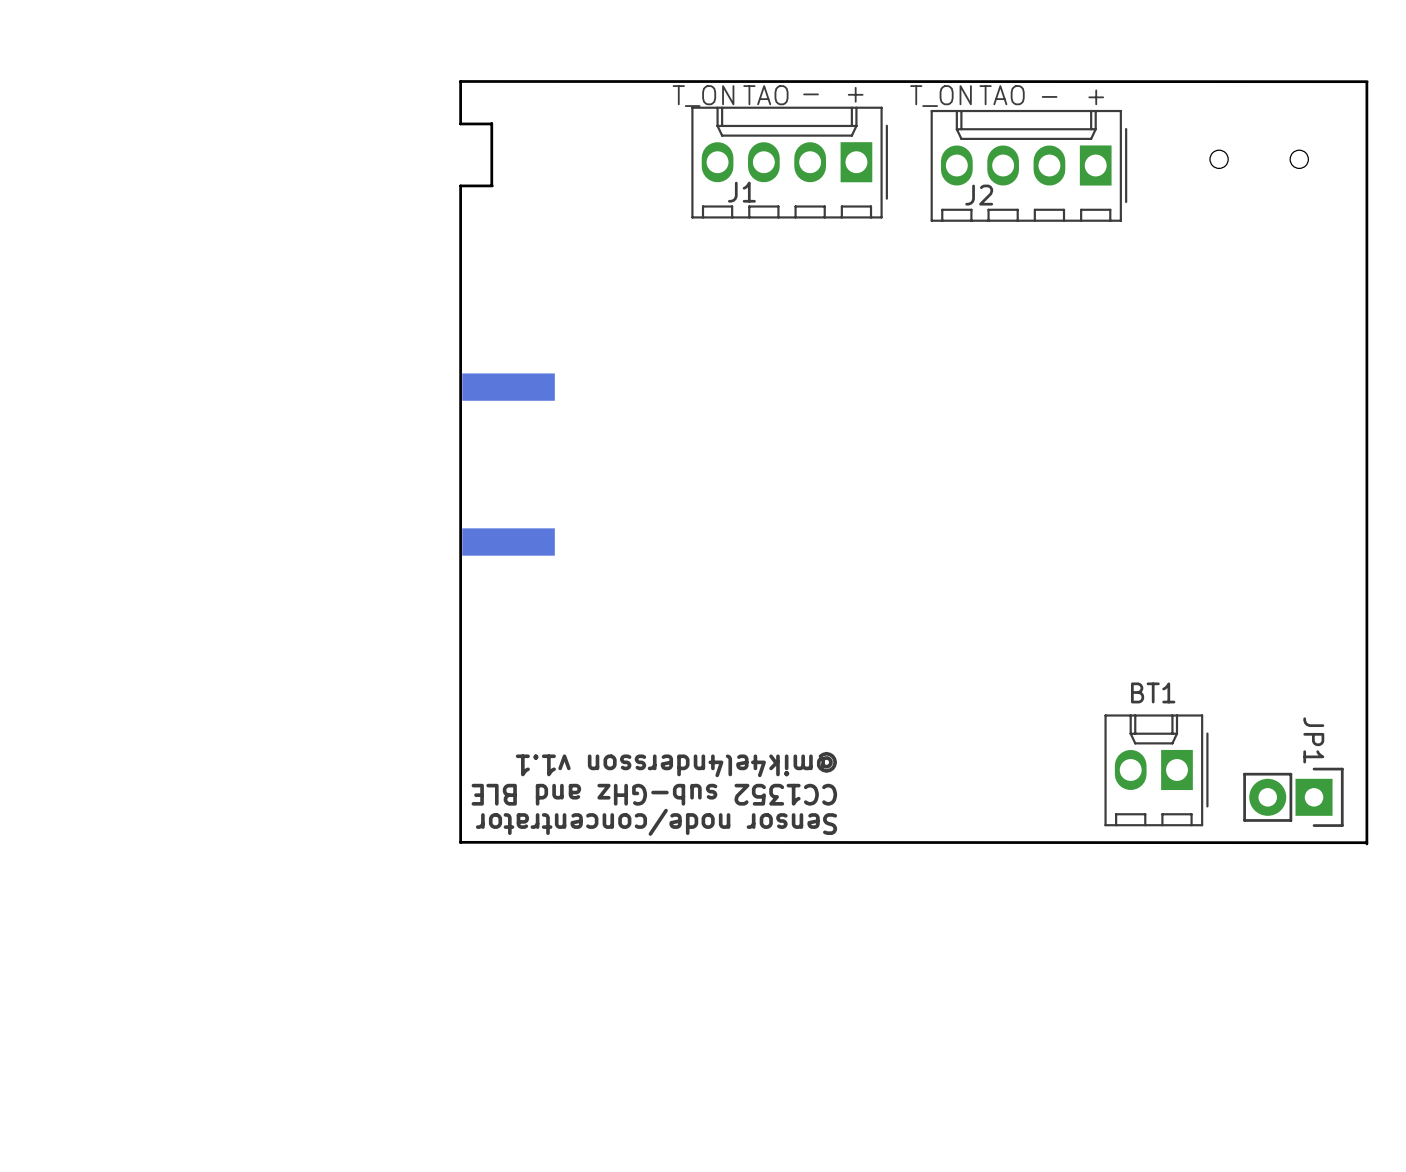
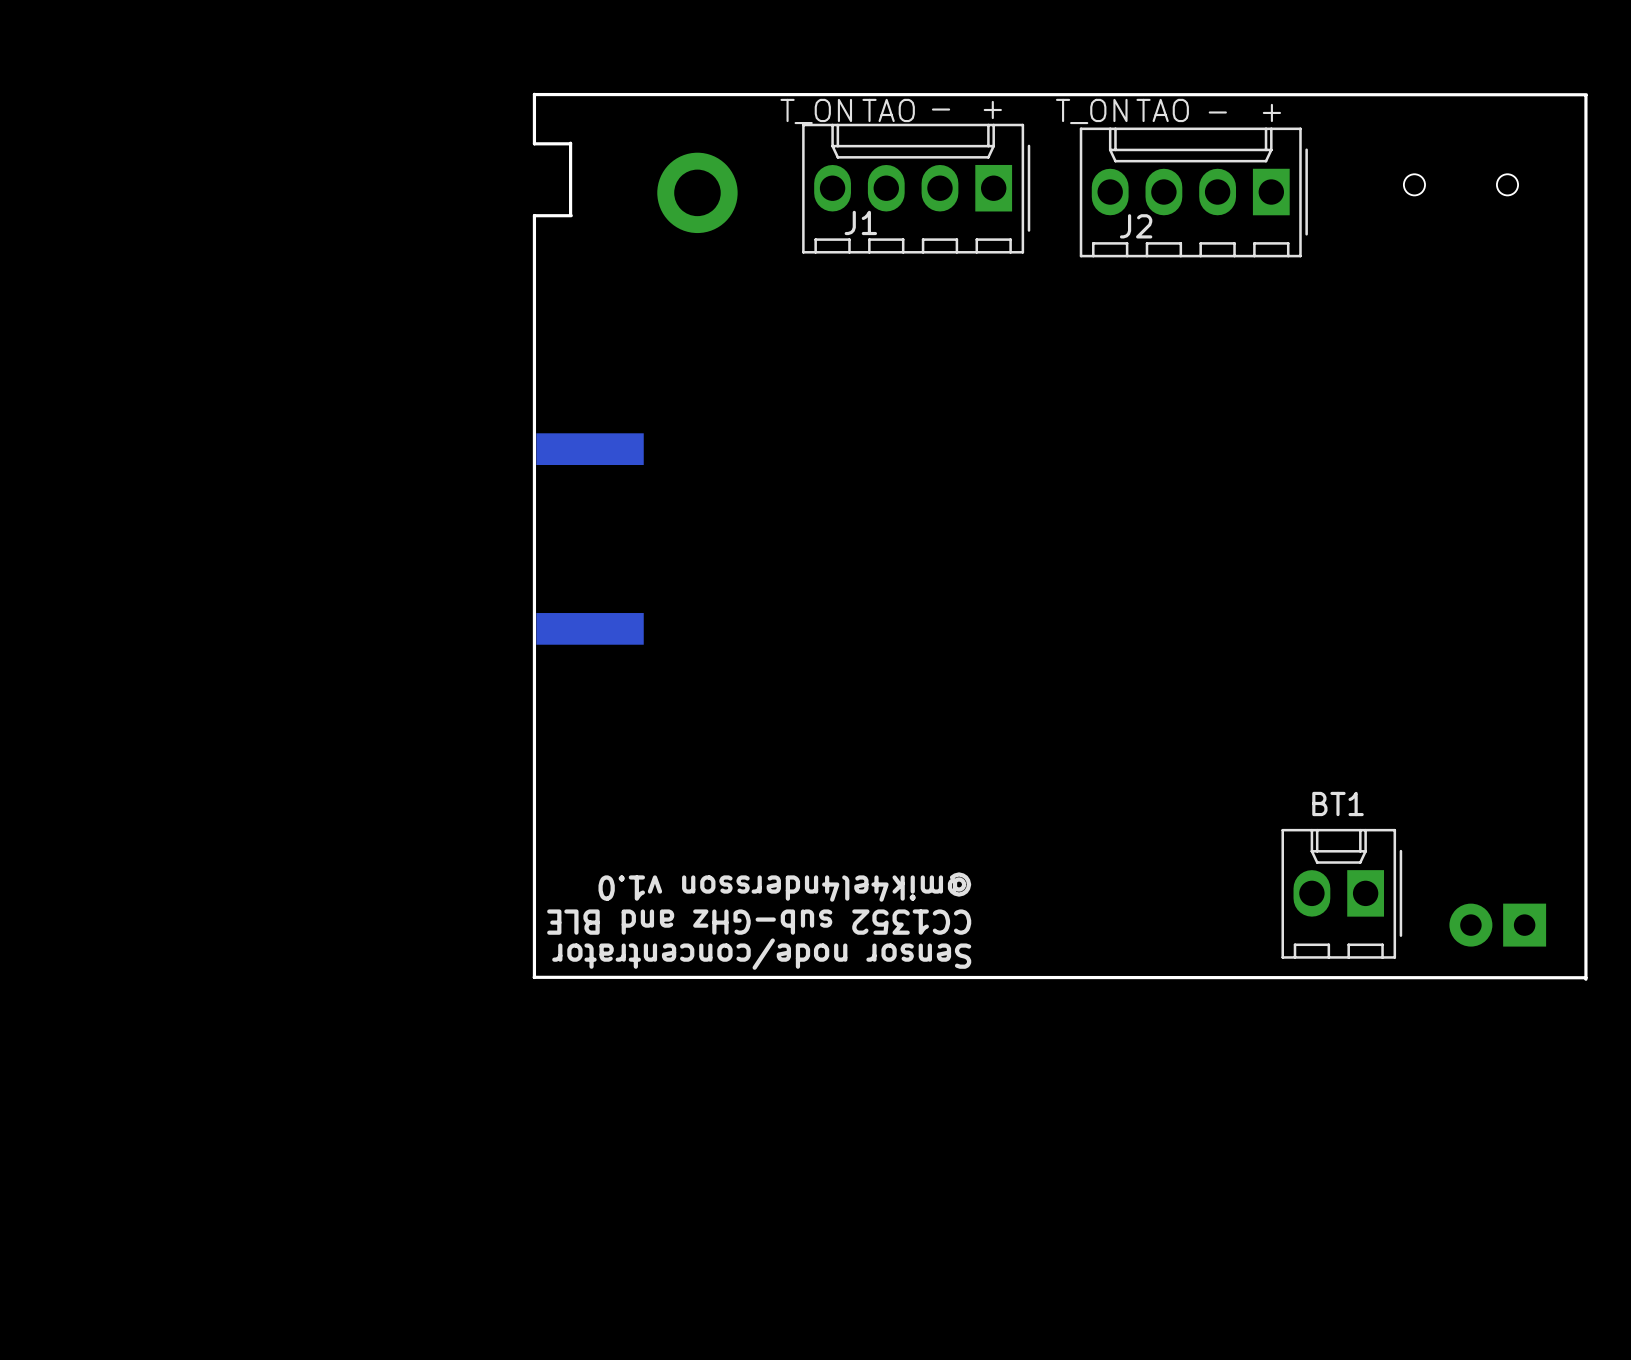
part: none -> (697, 192)
text: @mik4el4ndersson v1.1 (676, 764) -> @mik4el4ndersson v1.0 (784, 887)
JP1 side: bottom (1293, 797) -> top (1497, 925)

